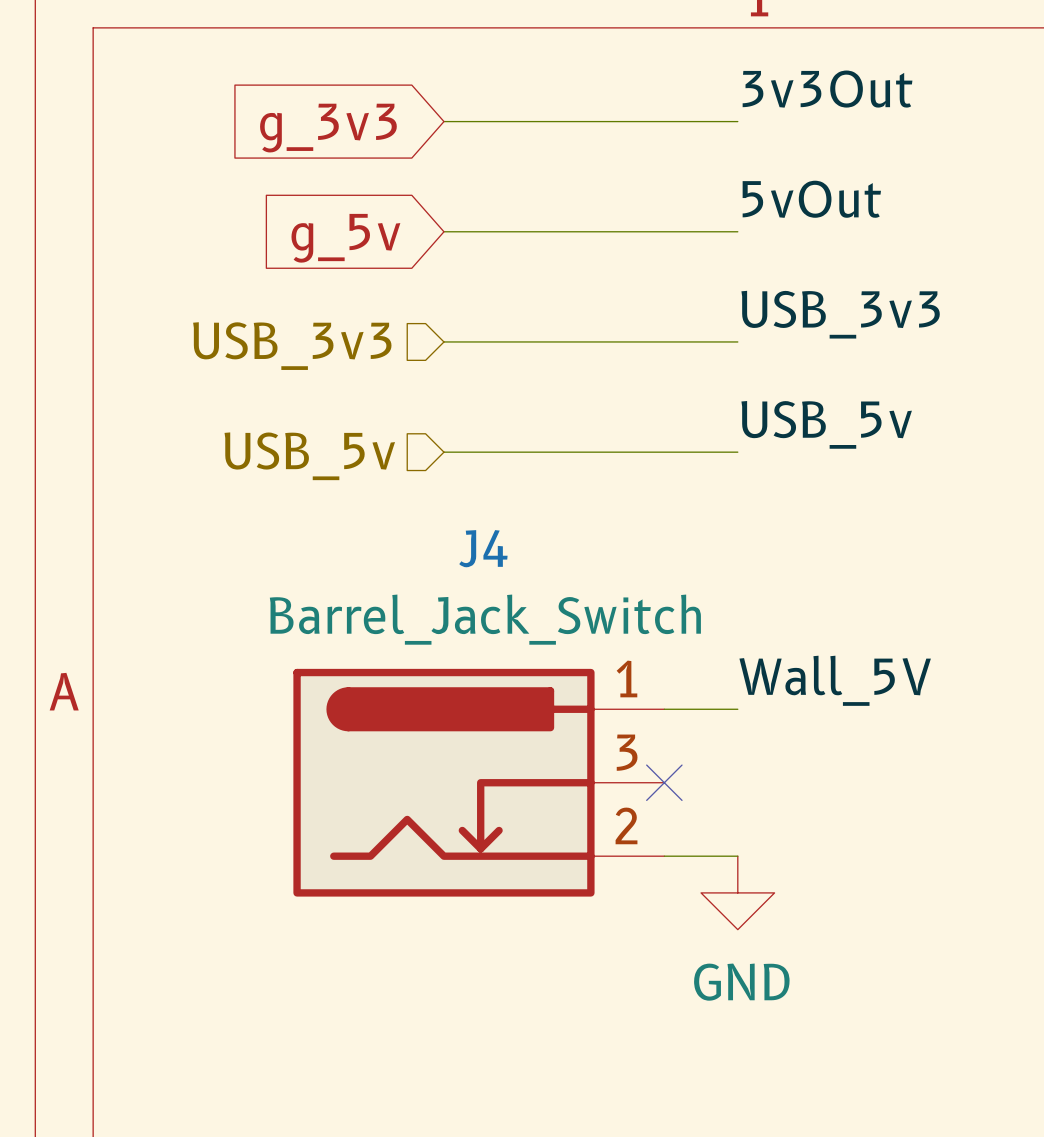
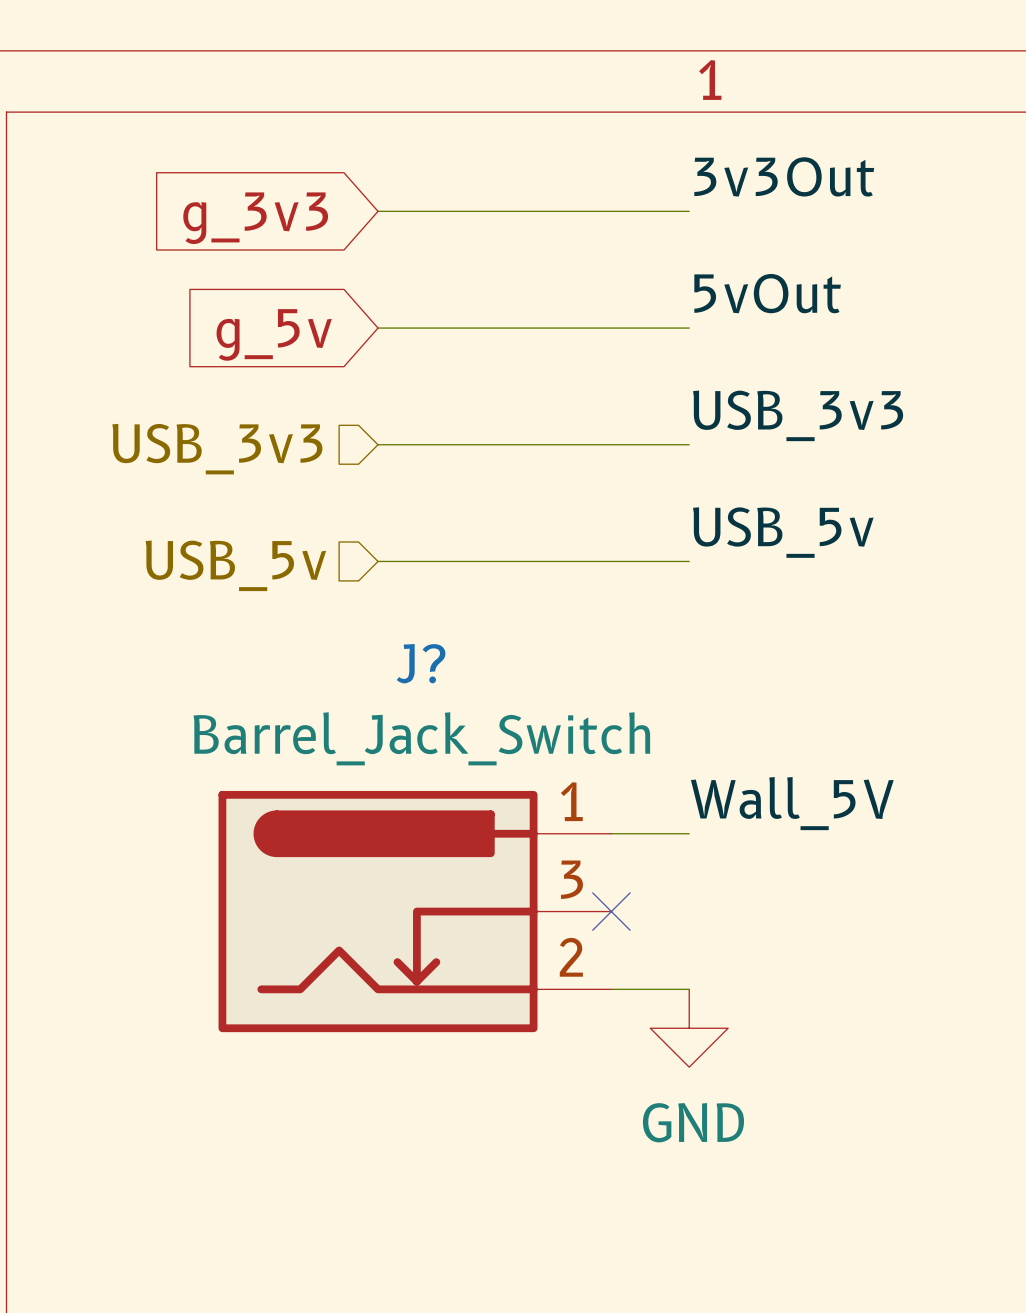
J4 name: J4 (483, 548) -> J? (421, 663)

